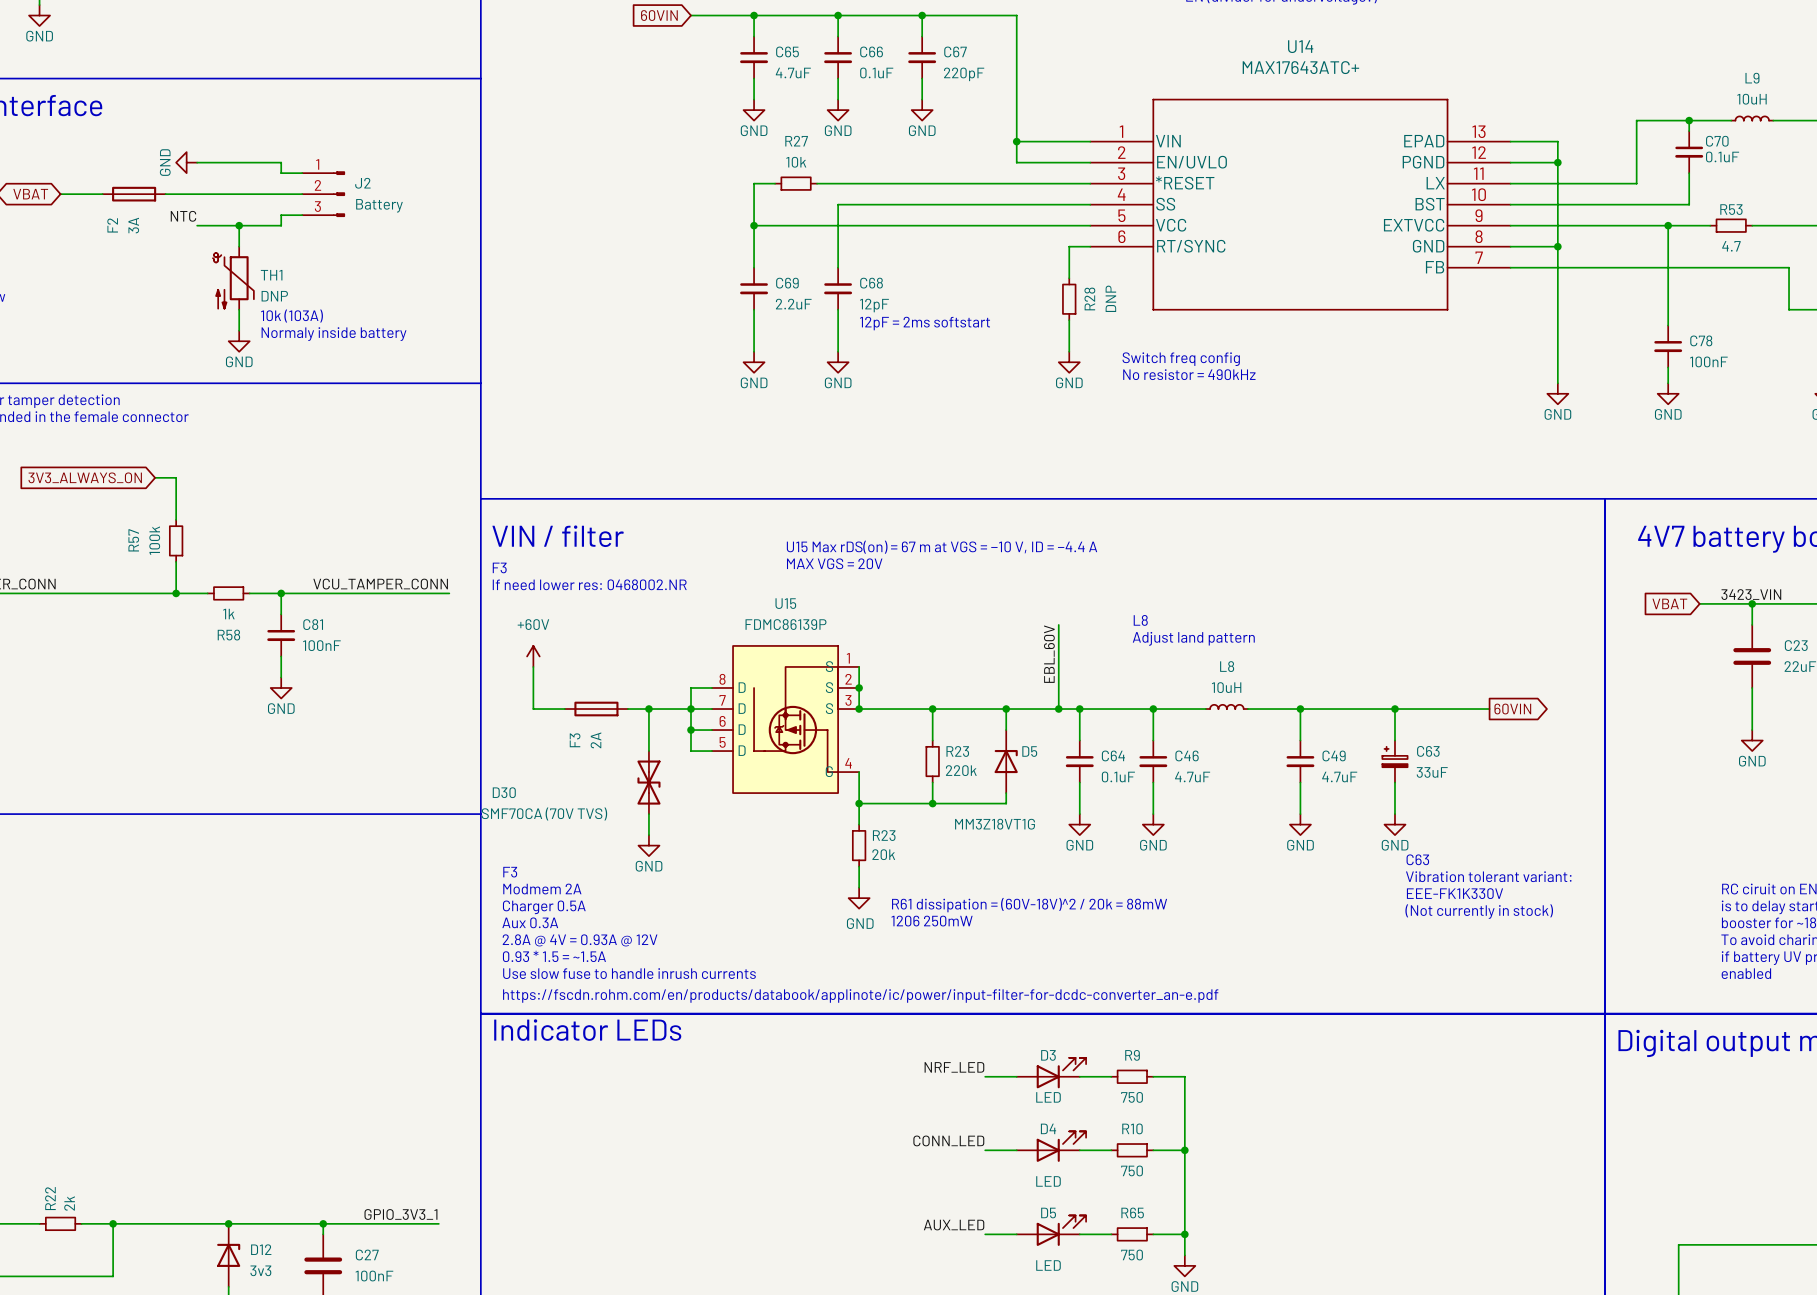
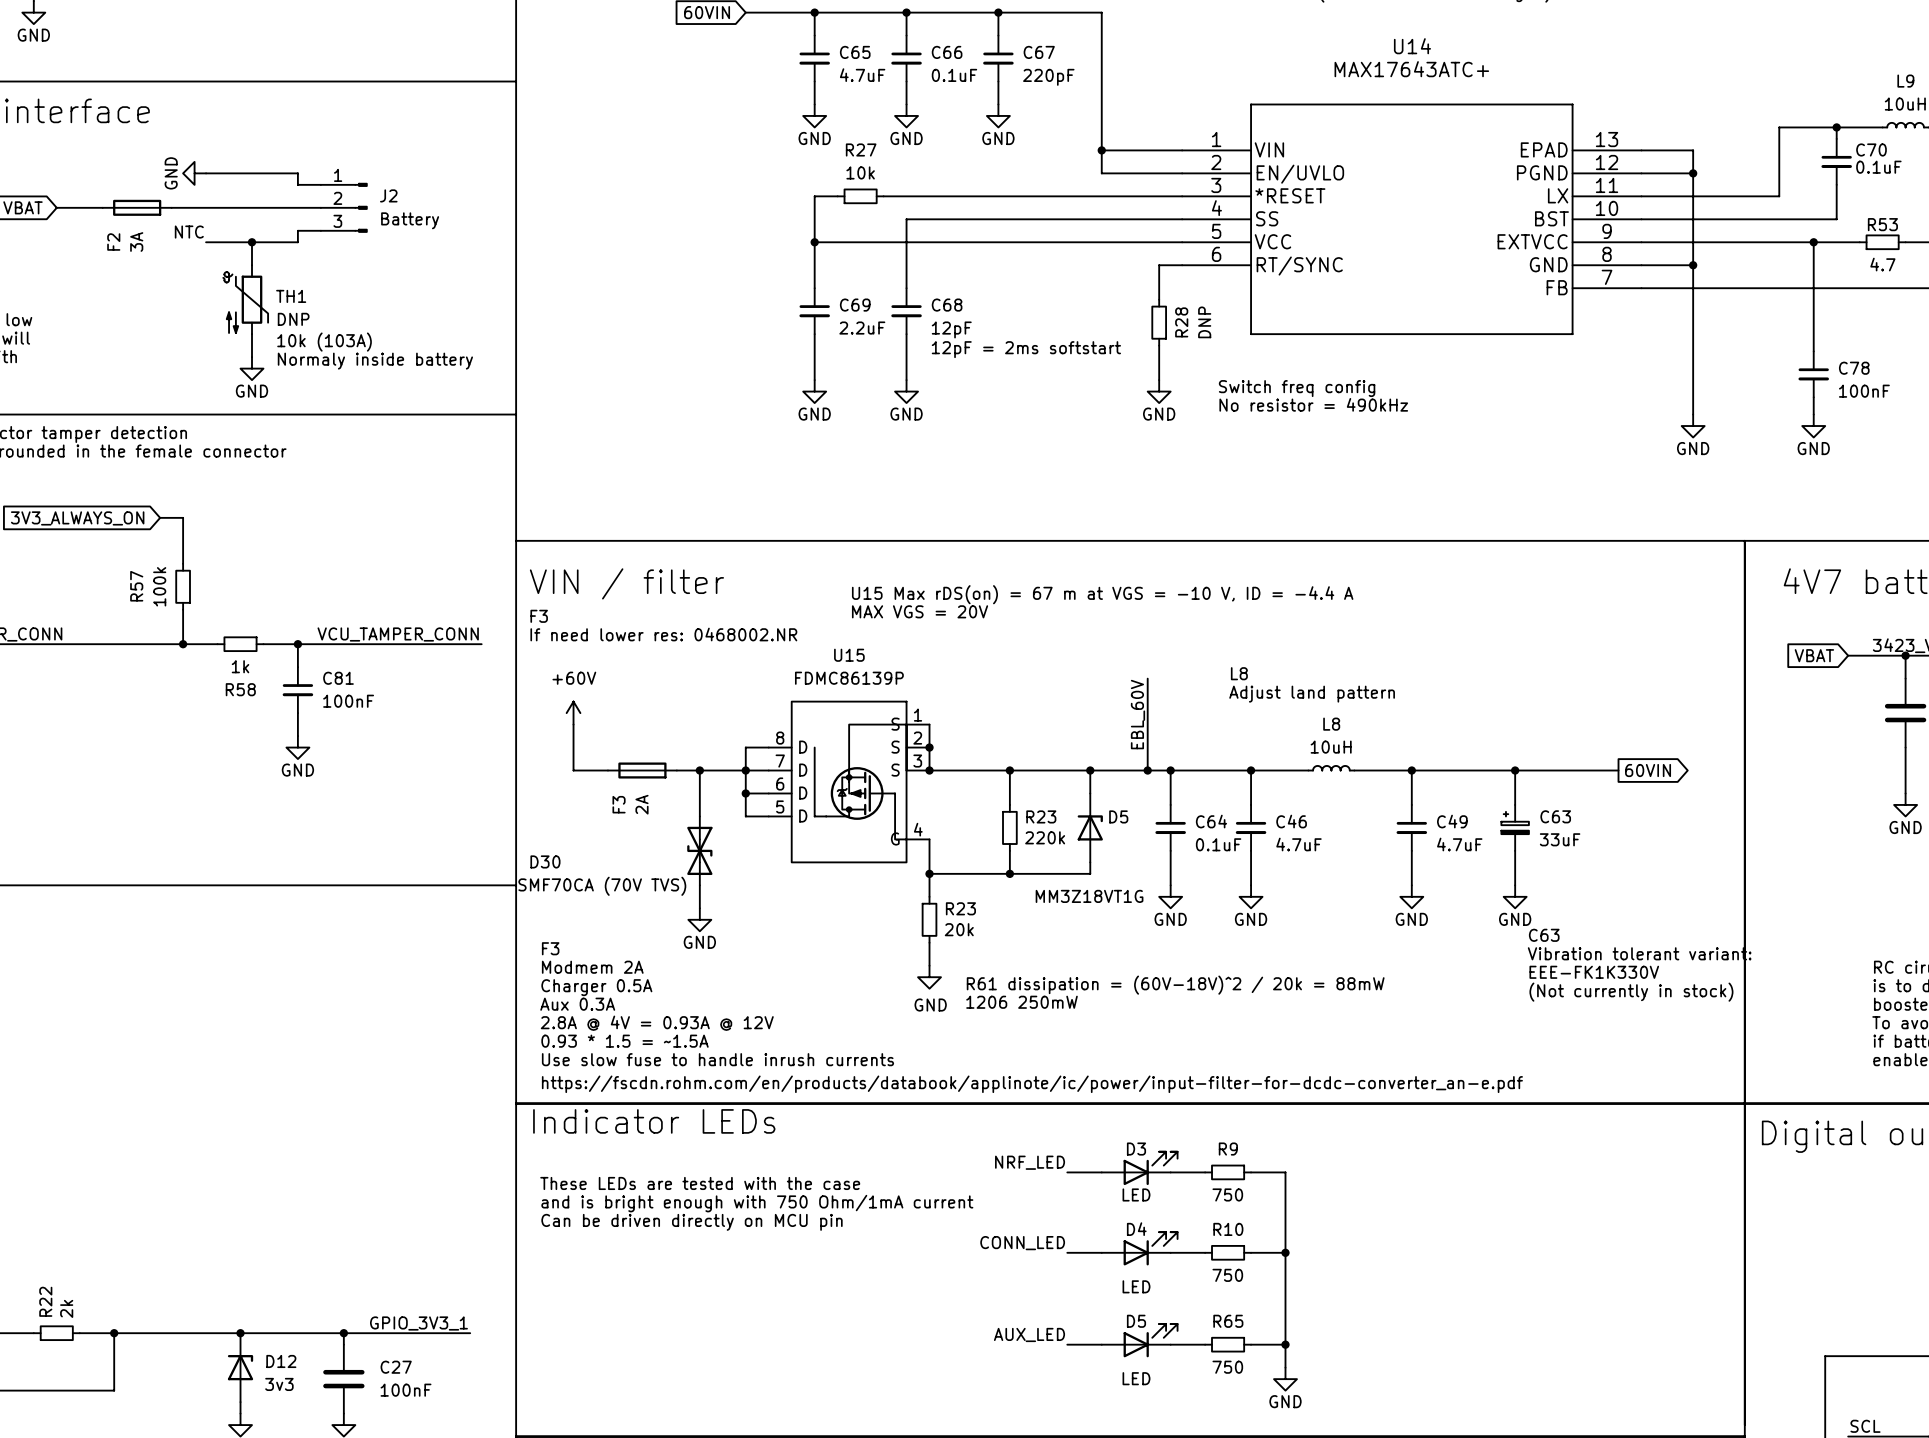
text: none -> These LEDs are tested with the case (700, 1183)
text: none -> and is bright enough with 750 Ohm/1mA current (757, 1203)
text: none -> Can be driven directly on MCU pin (692, 1222)

